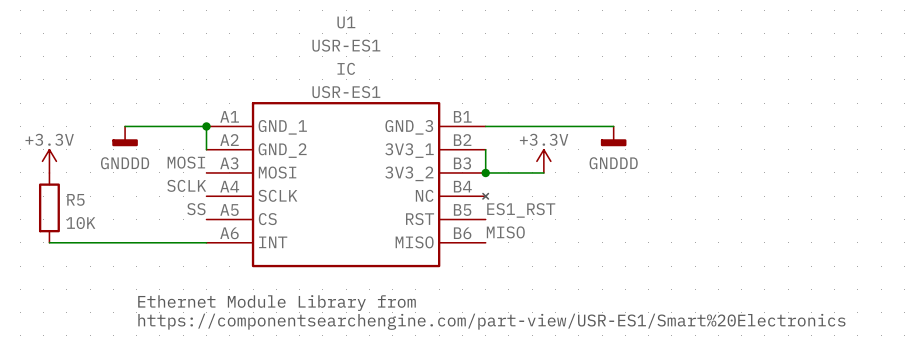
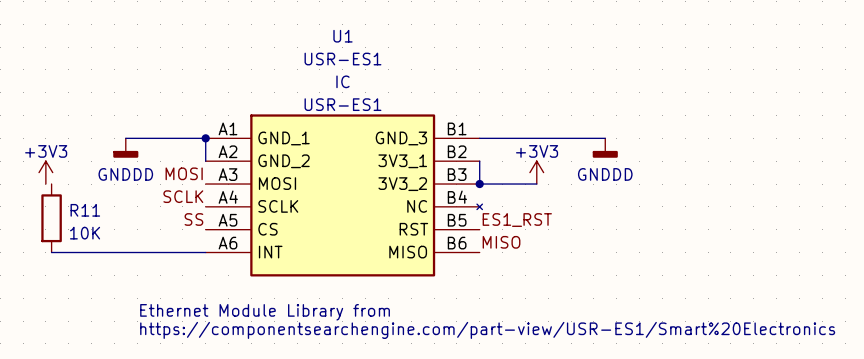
power symbol: +3.3V (49, 161) -> +3V3 (45, 172)
power symbol: +3.3V (543, 161) -> +3V3 (536, 172)
R5 name: R5 (75, 199) -> R11 (85, 210)

